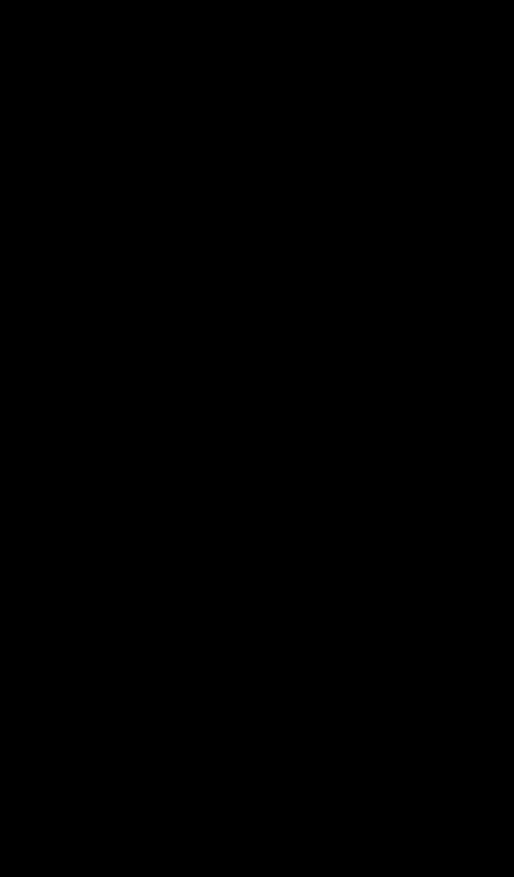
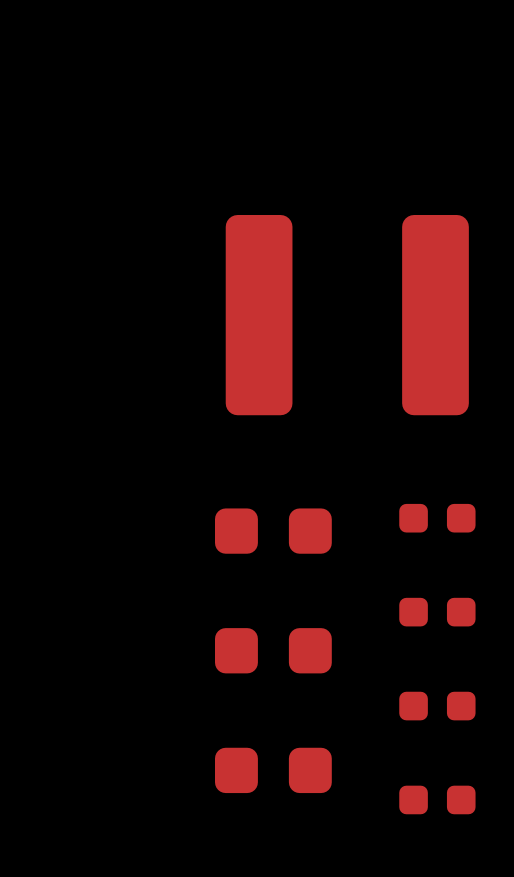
part: none -> (347, 315)
part: none -> (437, 518)
part: none -> (273, 531)
part: none -> (437, 612)
part: none -> (273, 650)
part: none -> (437, 706)
part: none -> (273, 770)
part: none -> (437, 799)

